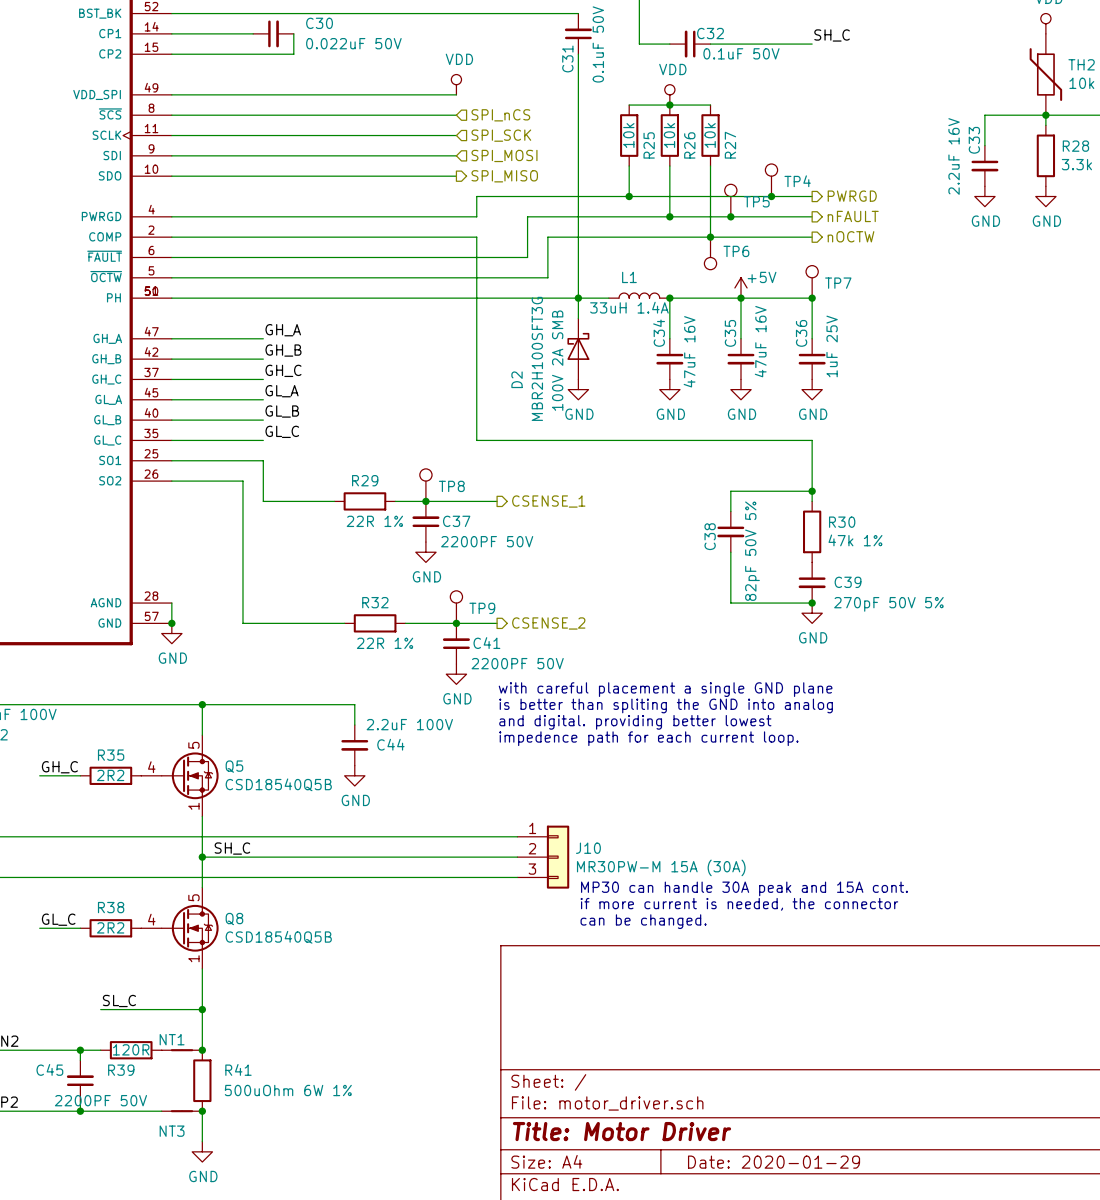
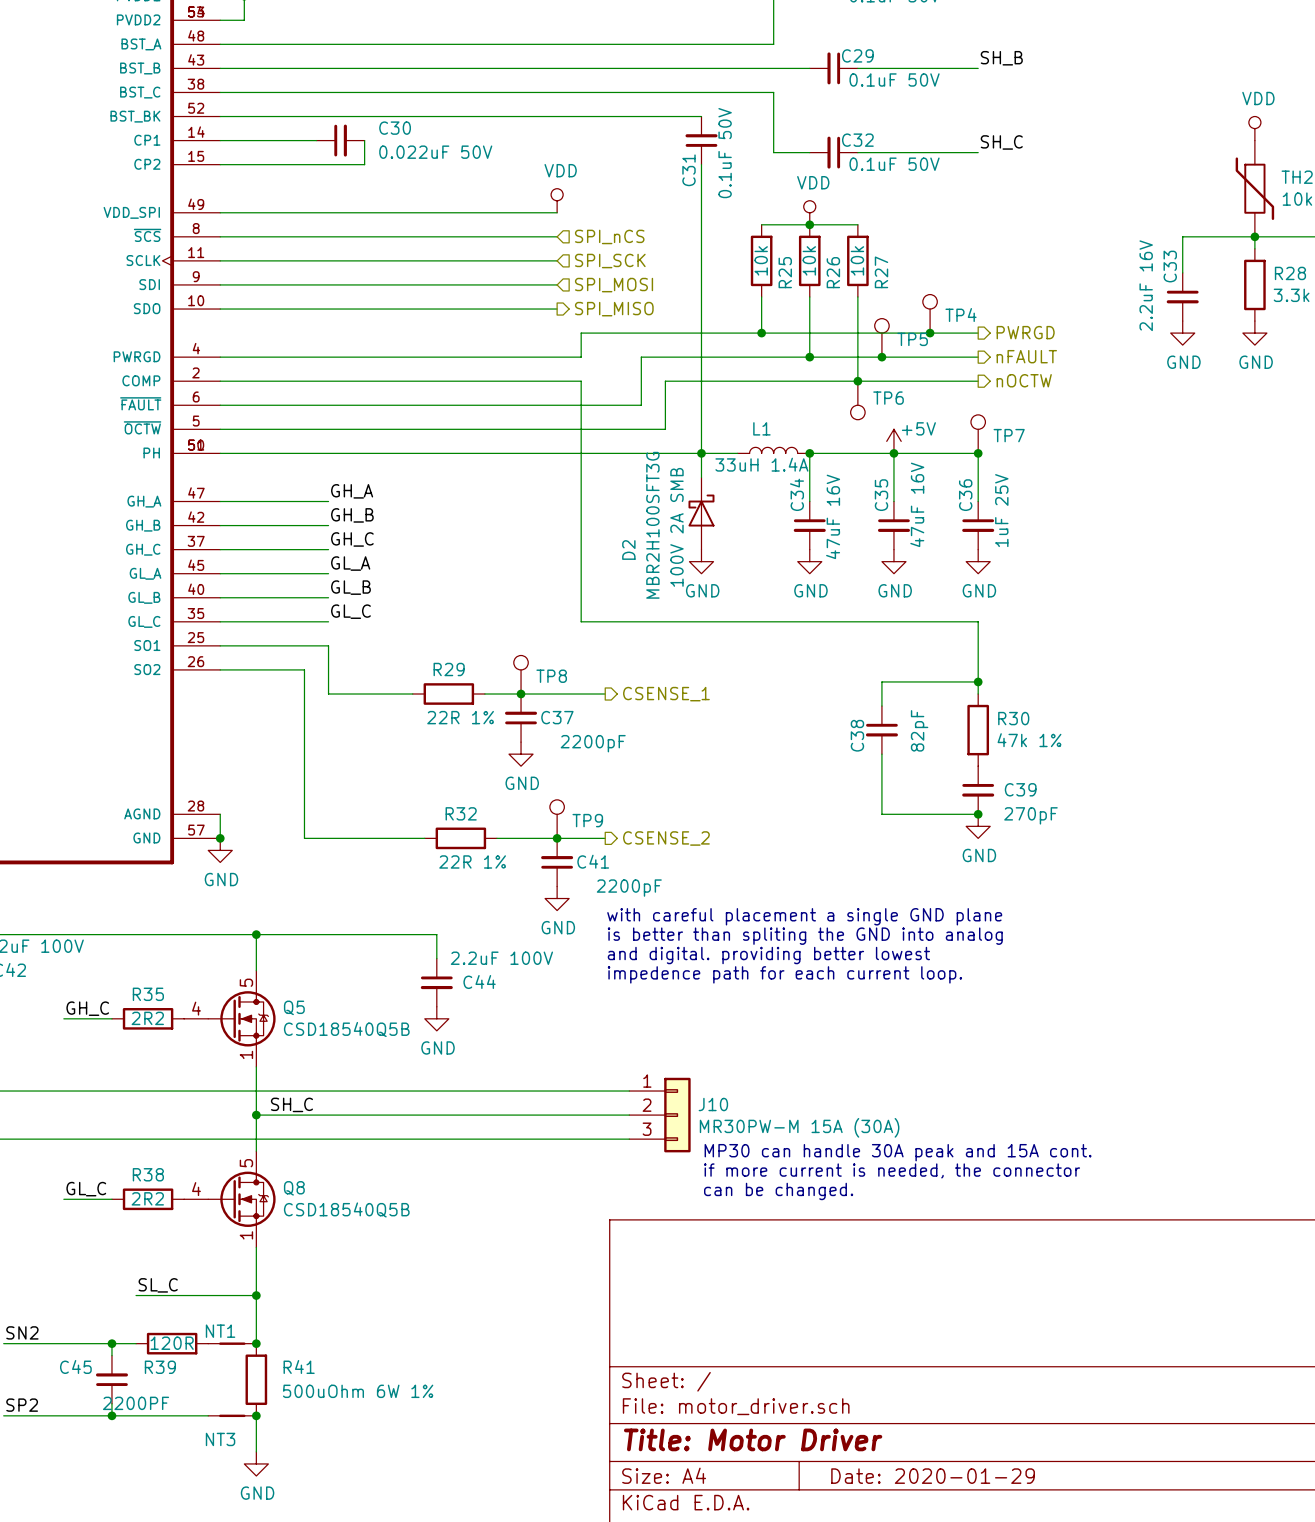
C37 value: 2200PF 50V (487, 541) -> 2200pF (593, 743)
C38 value: 82pF 50V 5% (752, 551) -> 82pF (919, 730)
C39 value: 270pF 50V 5% (888, 604) -> 270pF (1030, 815)
C41 value: 2200PF 50V (517, 663) -> 2200pF (629, 888)
C45 value: 2200PF 50V (100, 1100) -> 2200PF (136, 1403)

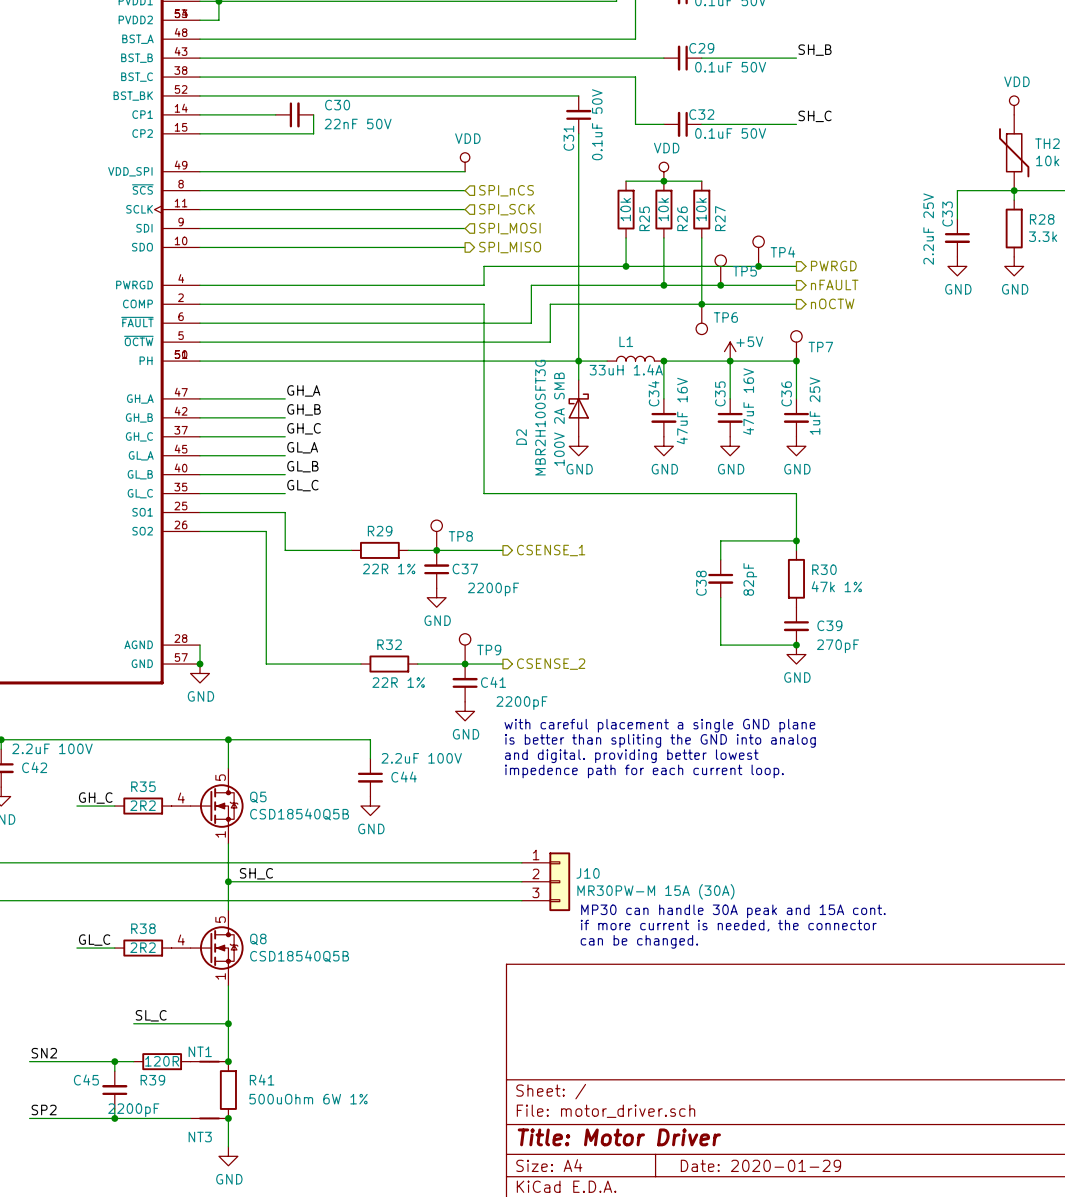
C30 value: 0.022uF 50V (435, 152) -> 22nF 50V (358, 124)
C33 value: 2.2uF 16V (1146, 285) -> 2.2uF 25V (928, 229)
C45 value: 2200PF (136, 1403) -> 2200pF (133, 1110)

